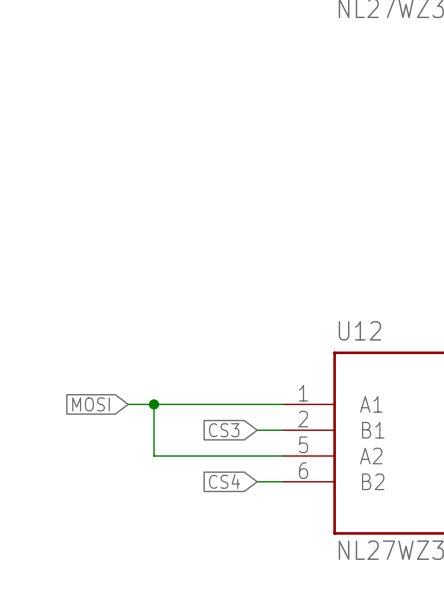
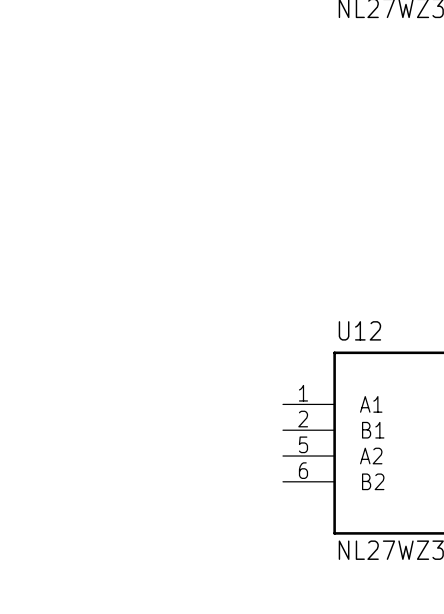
global label: MOSI (91, 404) -> none
wire: (128, 404) (283, 404) -> none
wire: (154, 404) (154, 456) (283, 456) -> none
junction: (154, 404) -> none
global label: CS3 (224, 430) -> none
wire: (257, 430) (283, 430) -> none
global label: CS4 (224, 481) -> none
wire: (257, 481) (283, 481) -> none

